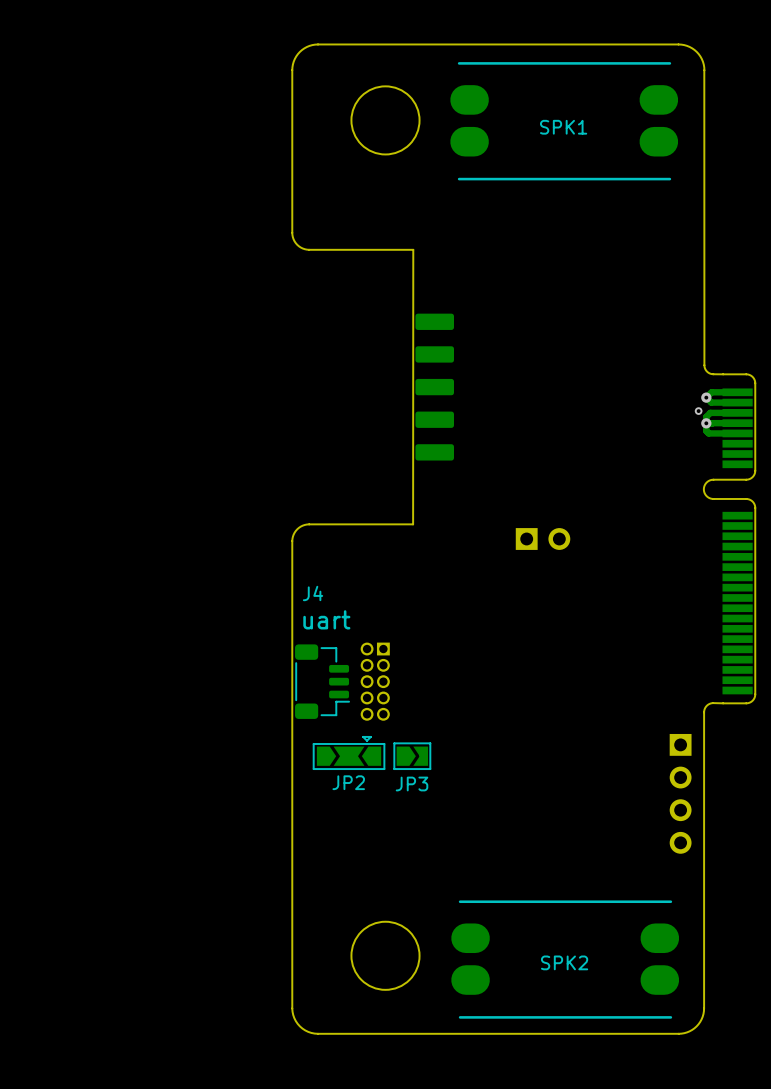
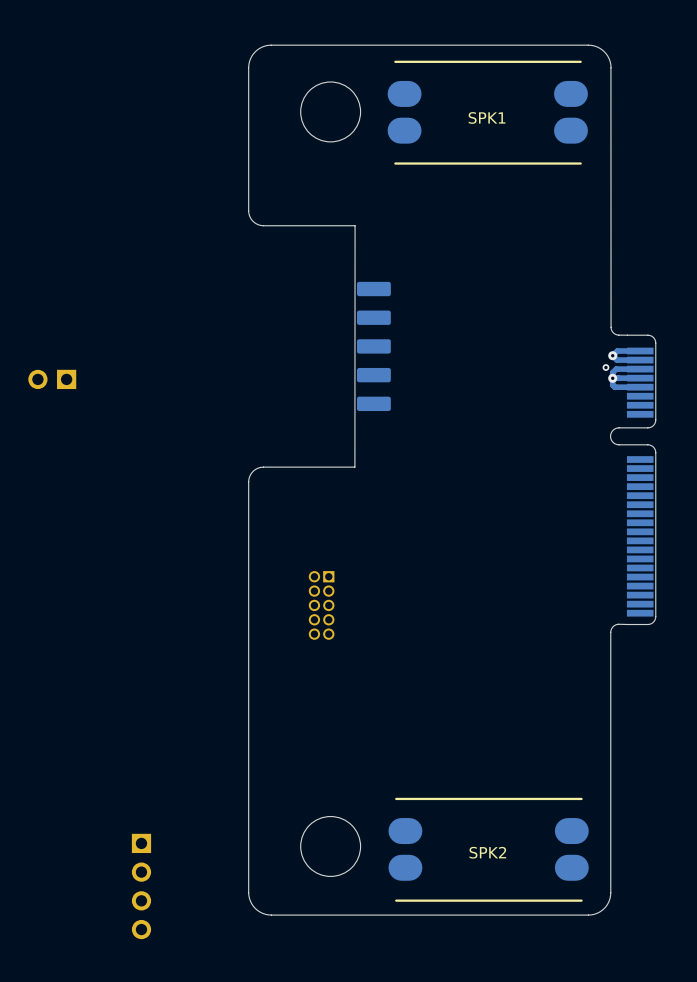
part: none -> (52, 379)
part: (543, 539) -> none
text: uart (326, 619) -> none
J4: (322, 681) -> none
JP2: (349, 752) -> none
JP3: (412, 756) -> none
part: (680, 793) -> none
part: none -> (141, 886)

